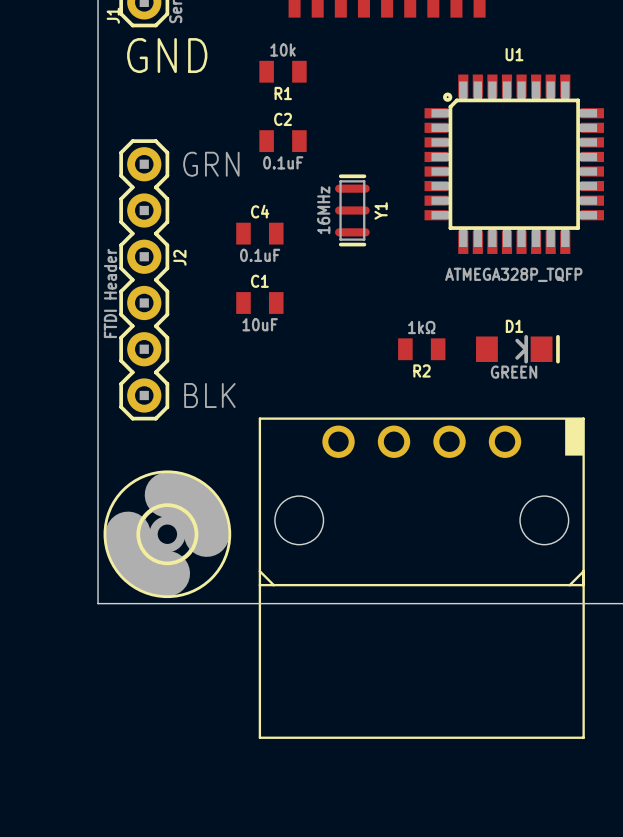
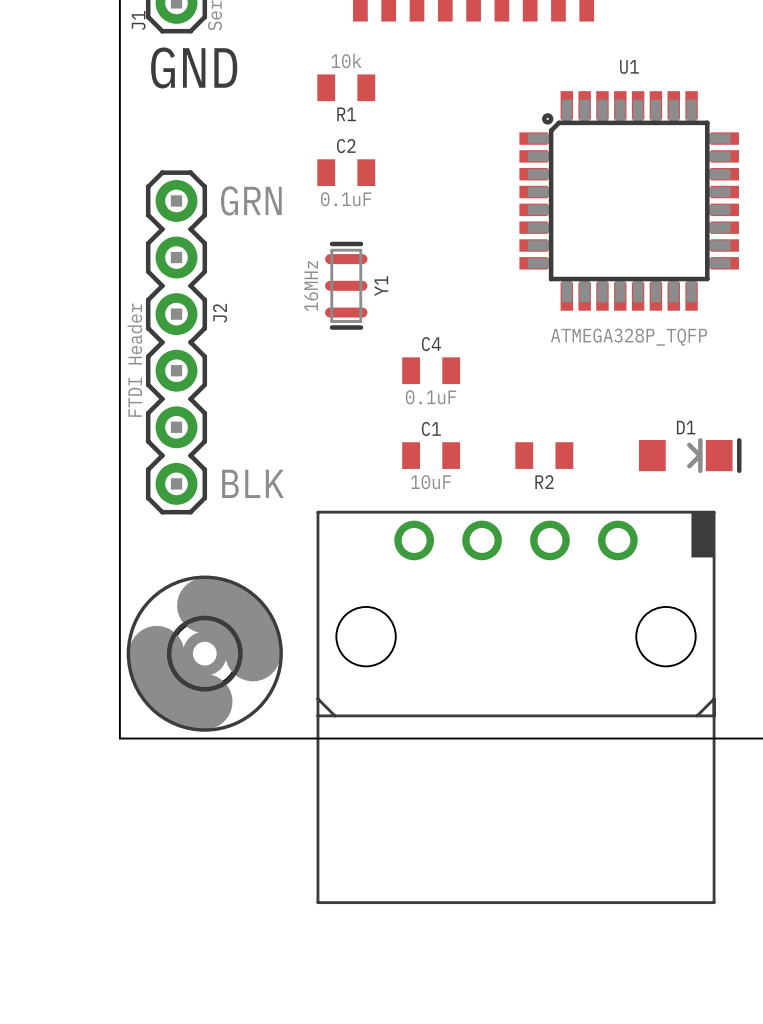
Y1 position: (352, 210) -> (346, 285)
C4 position: (259, 233) -> (431, 370)
C1 position: (259, 302) -> (431, 455)
R2 value: 1kΩ (421, 327) -> none
R2 position: (421, 349) -> (544, 455)
D1 position: (517, 349) -> (690, 455)
D1 value: GREEN (514, 372) -> none

